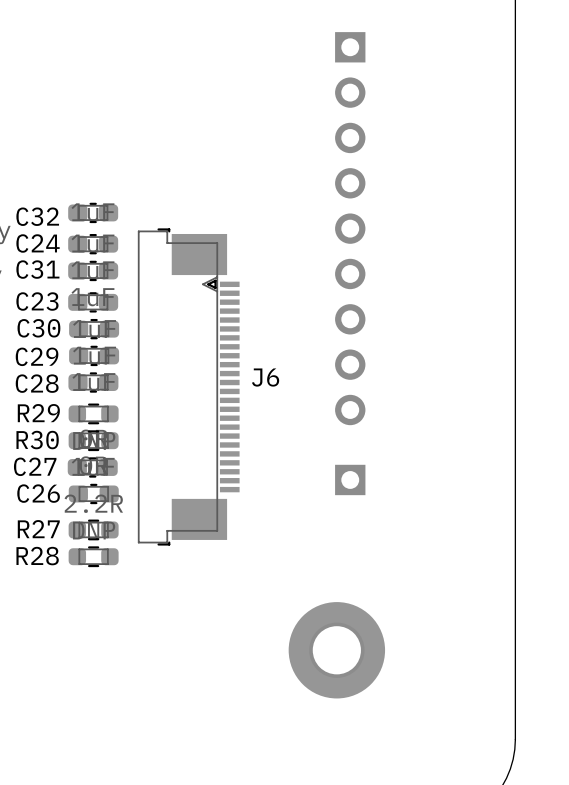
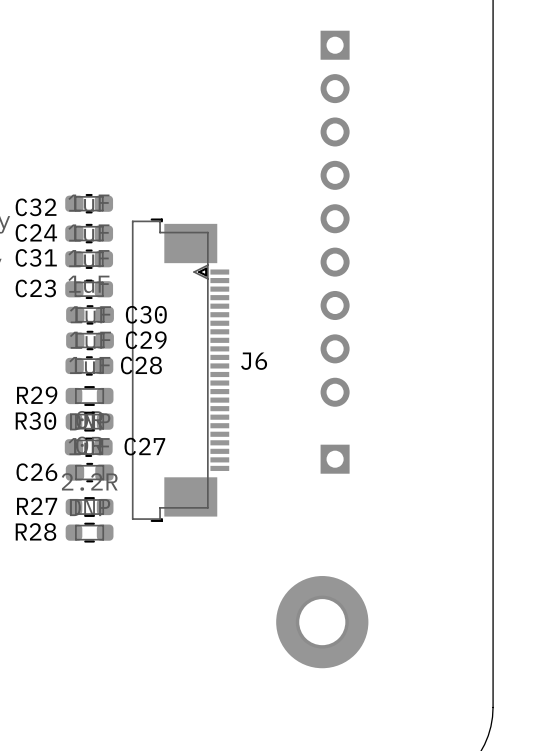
C30 name position: C30 (38, 328) -> C30 (146, 314)
C29 name position: C29 (37, 356) -> C29 (146, 340)
C28 name position: C28 (37, 383) -> C28 (141, 365)
C27 name position: C27 (35, 466) -> C27 (144, 446)

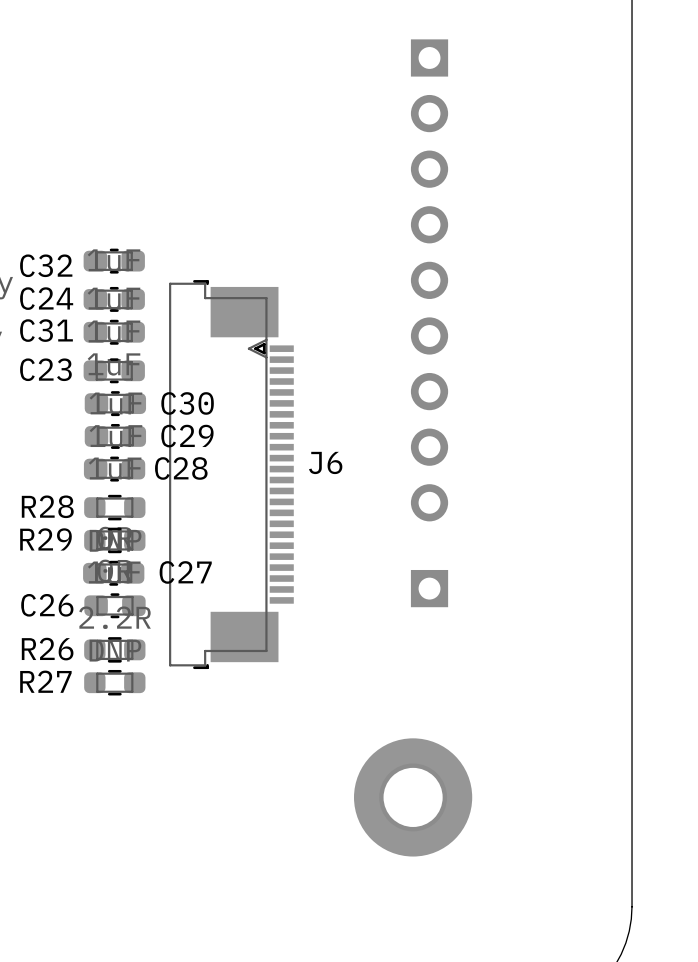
R29 name: R29 (37, 395) -> R28 (47, 506)
R30 name: R30 (35, 420) -> R29 (45, 539)
R27 name: R27 (37, 506) -> R26 (47, 649)
R28 name: R28 (35, 532) -> R27 (45, 681)

